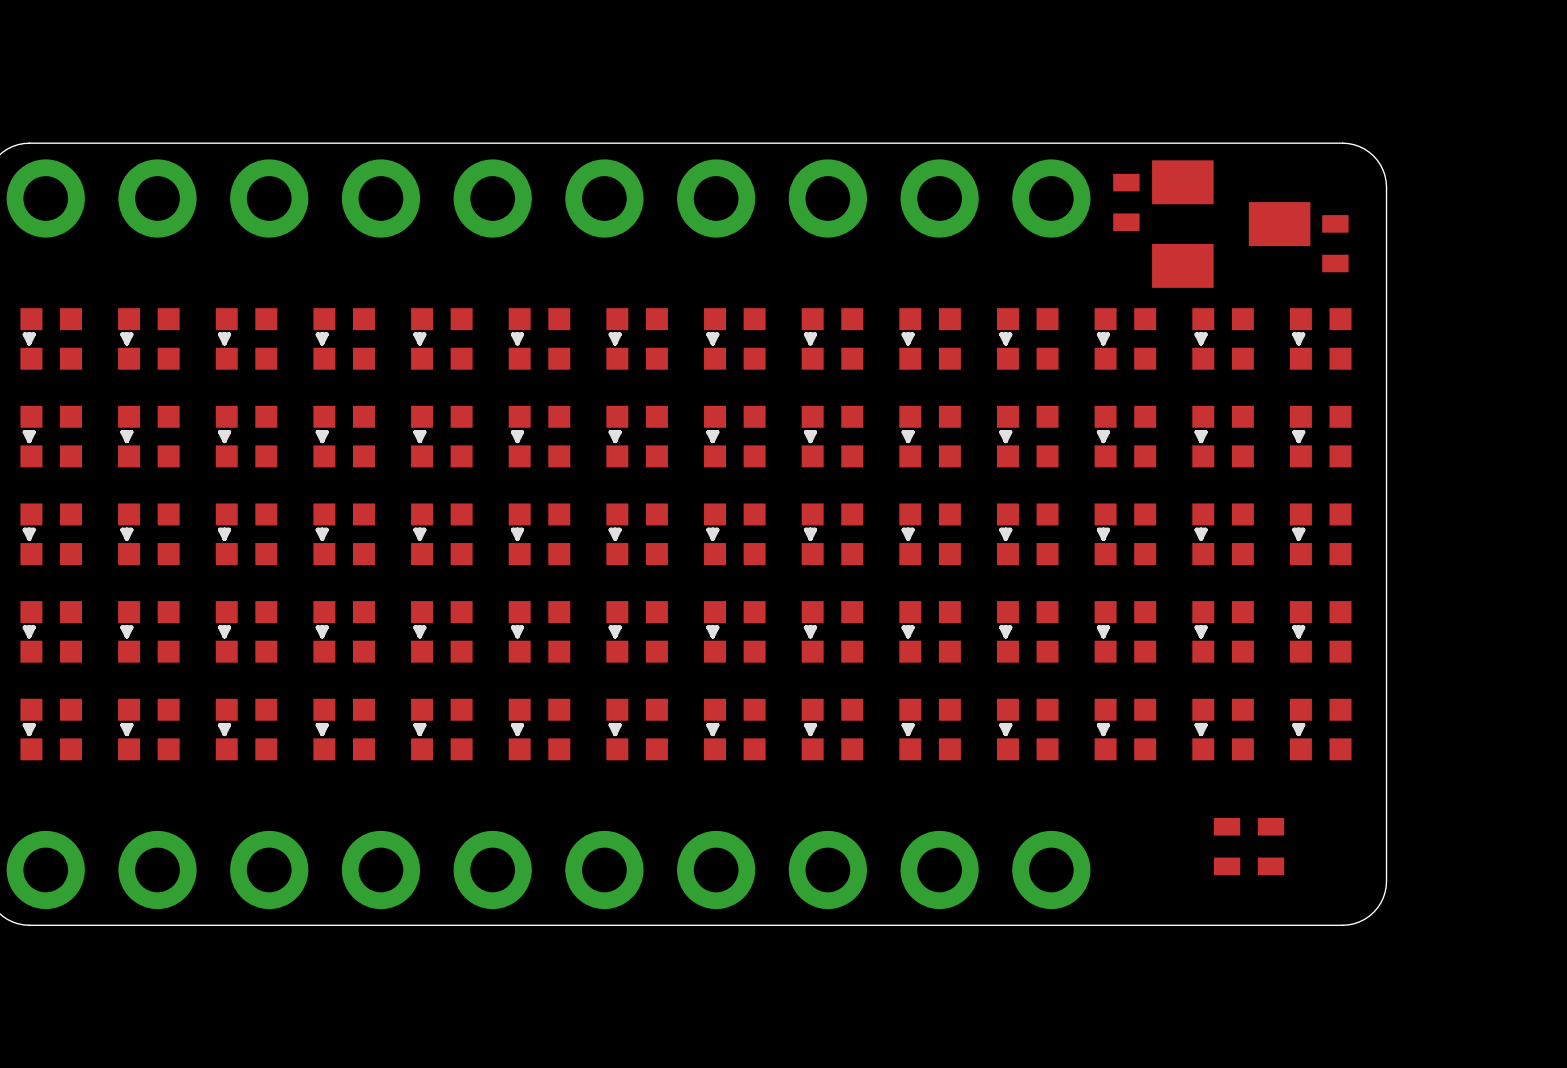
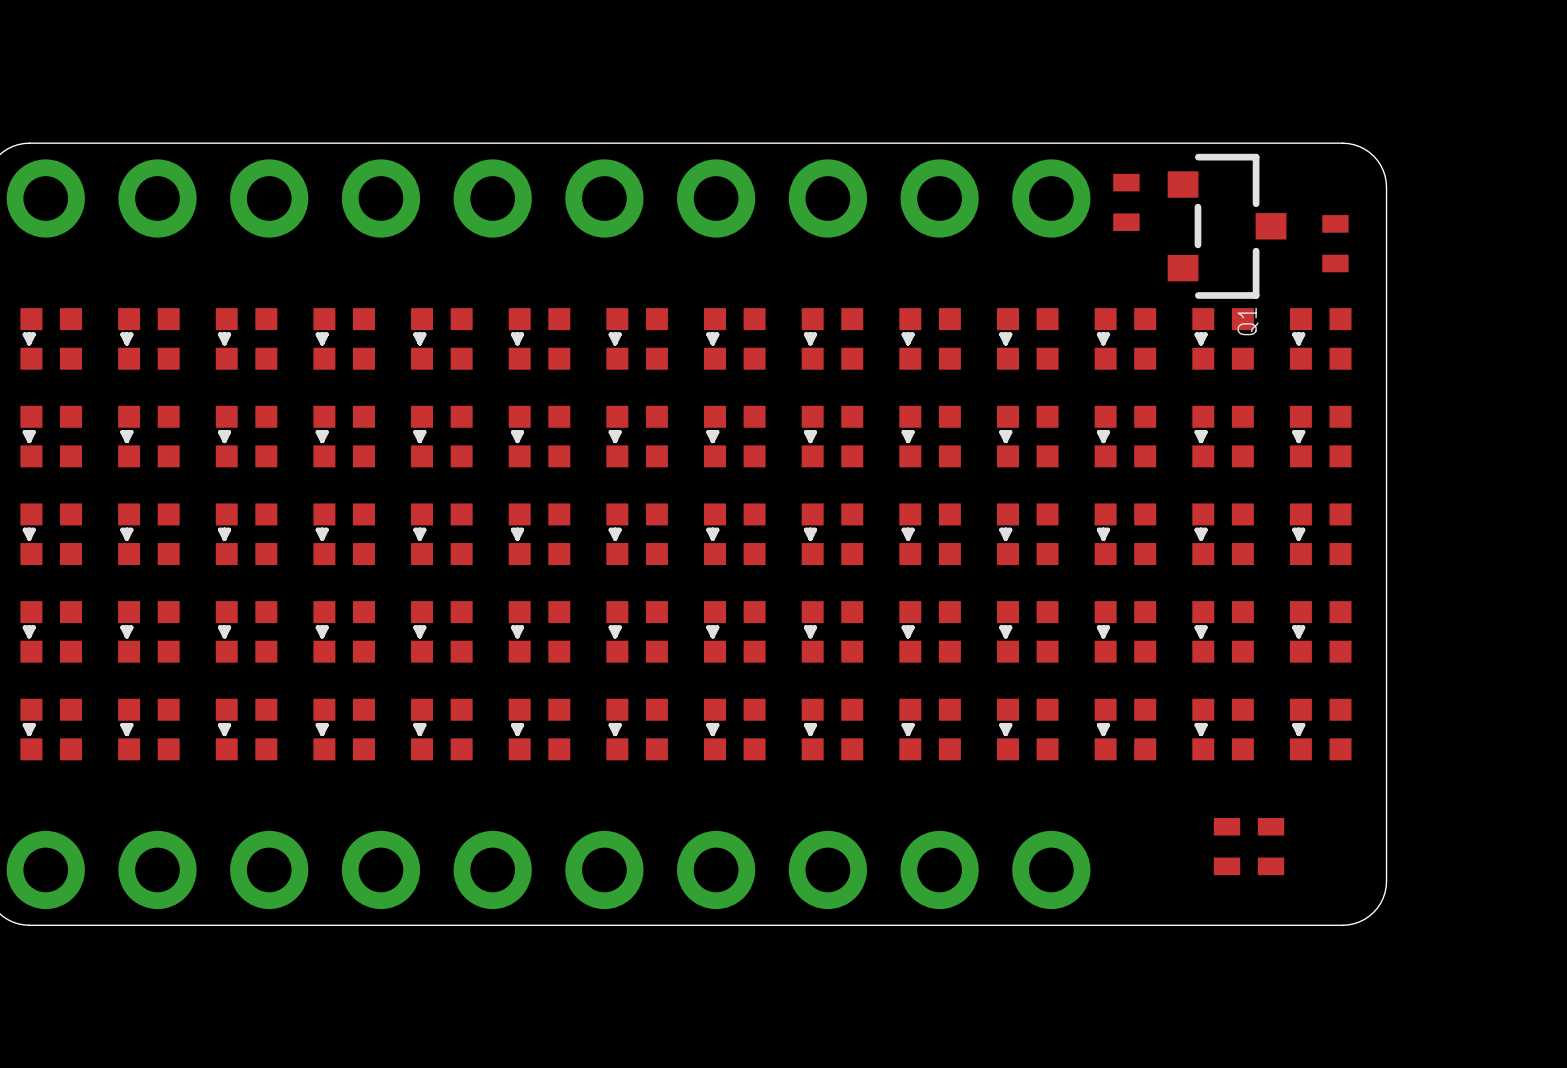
part: (1231, 224) -> none
Q1: none -> (1227, 226)

